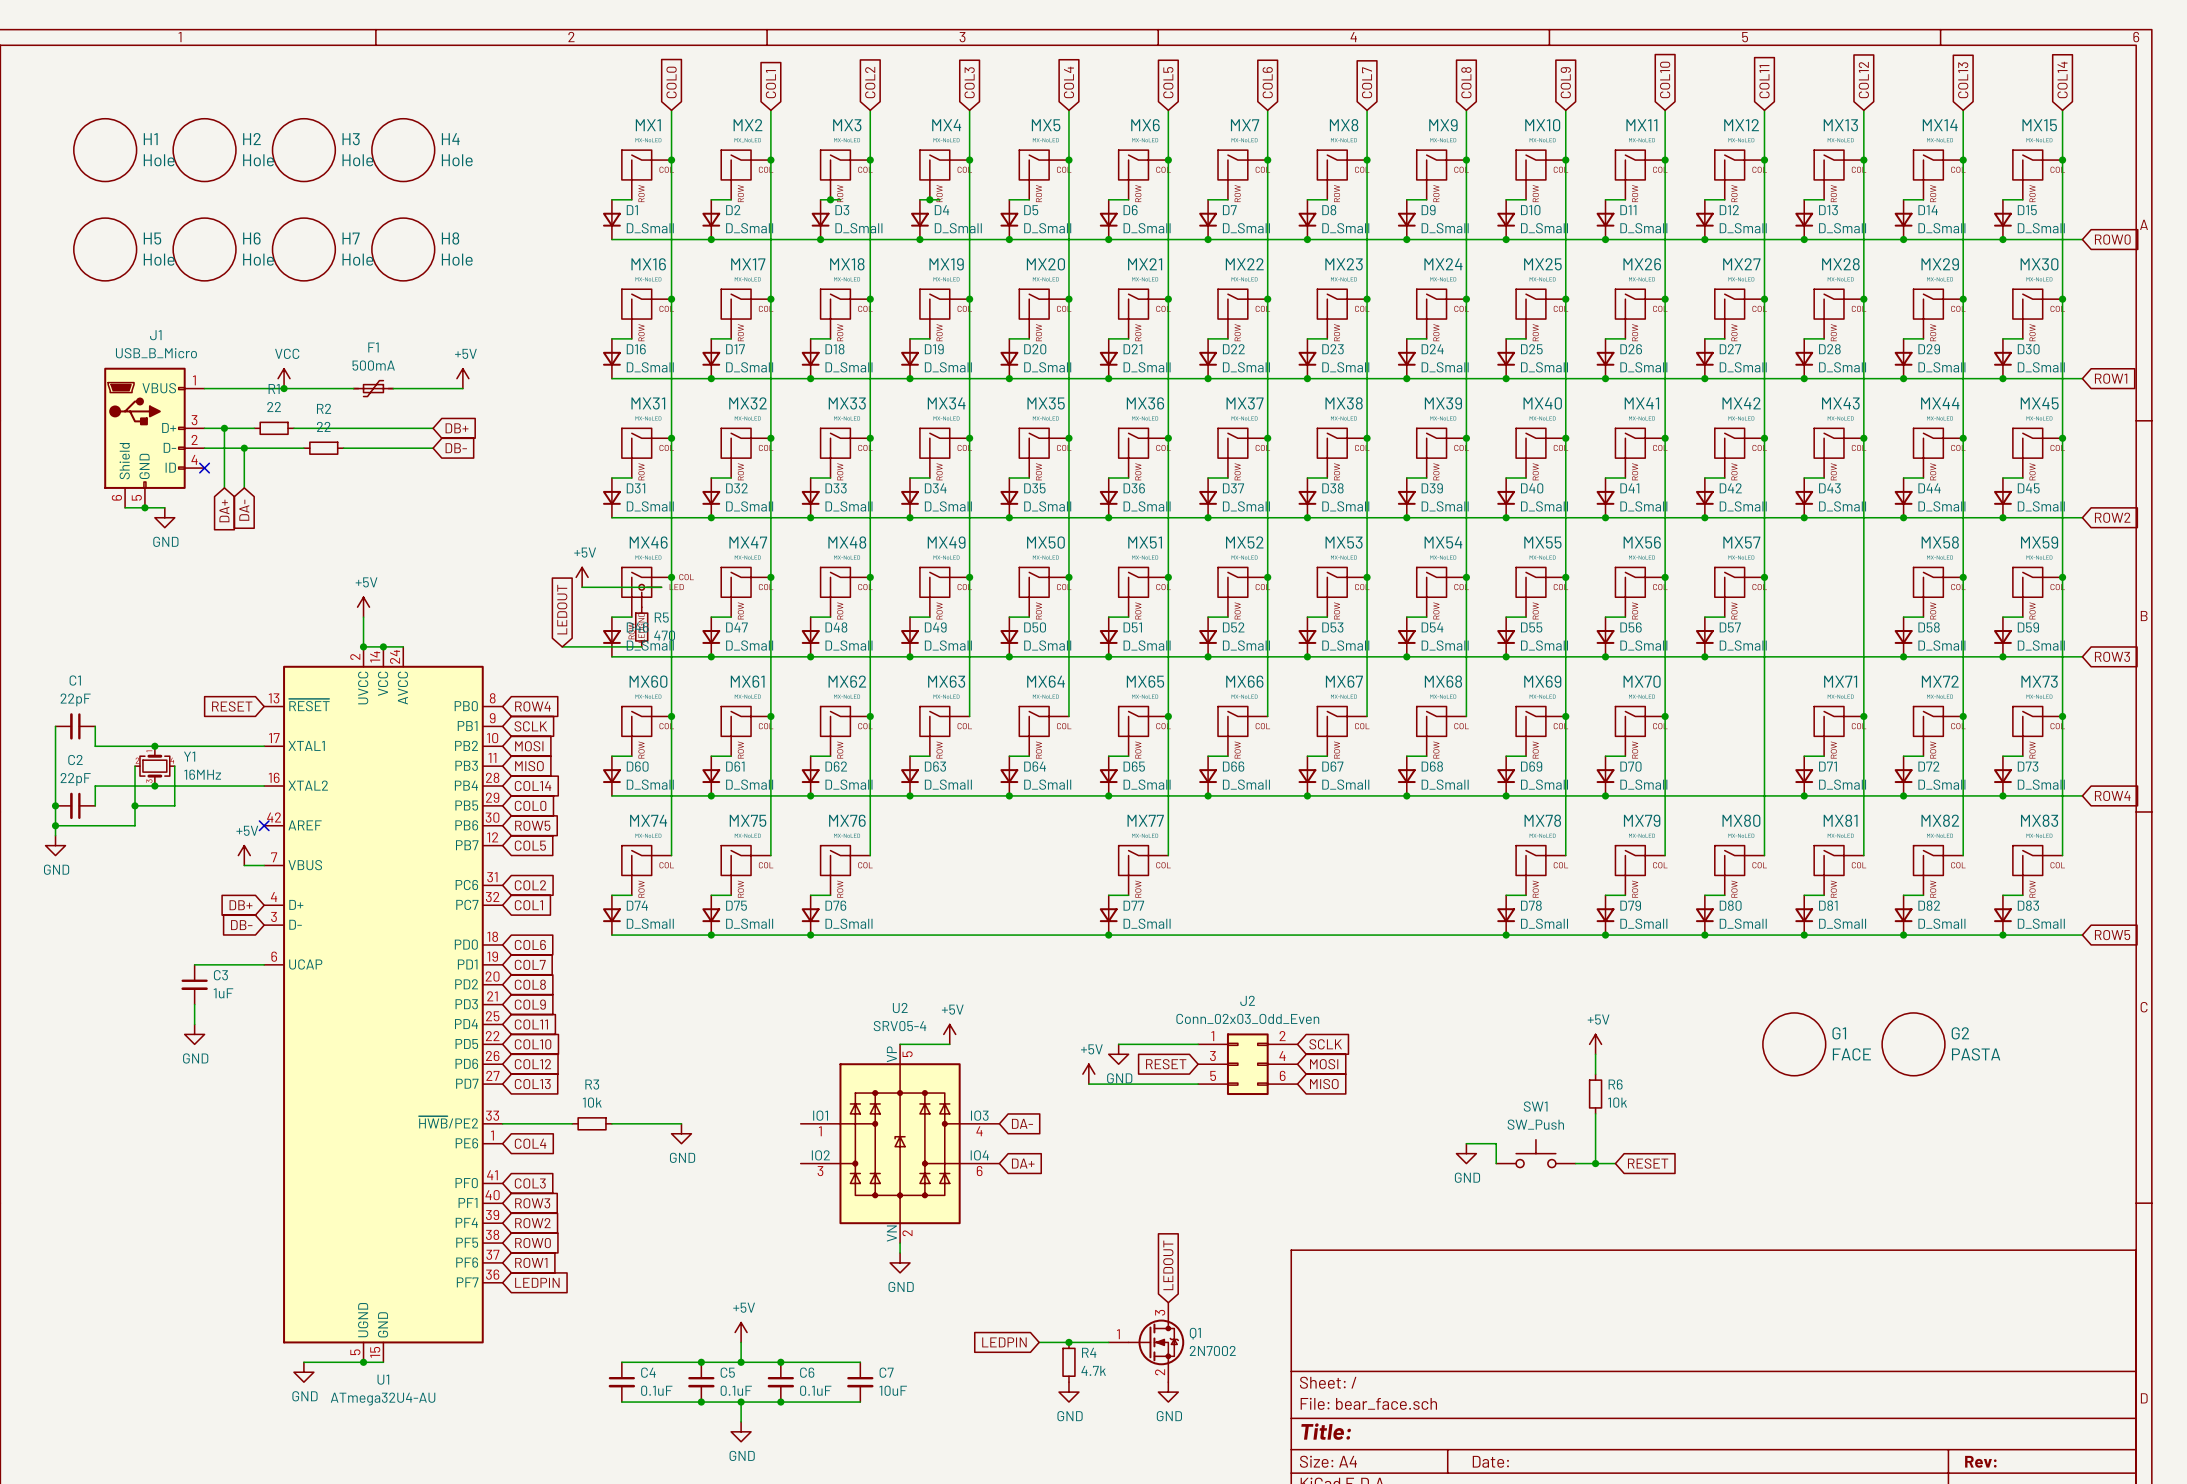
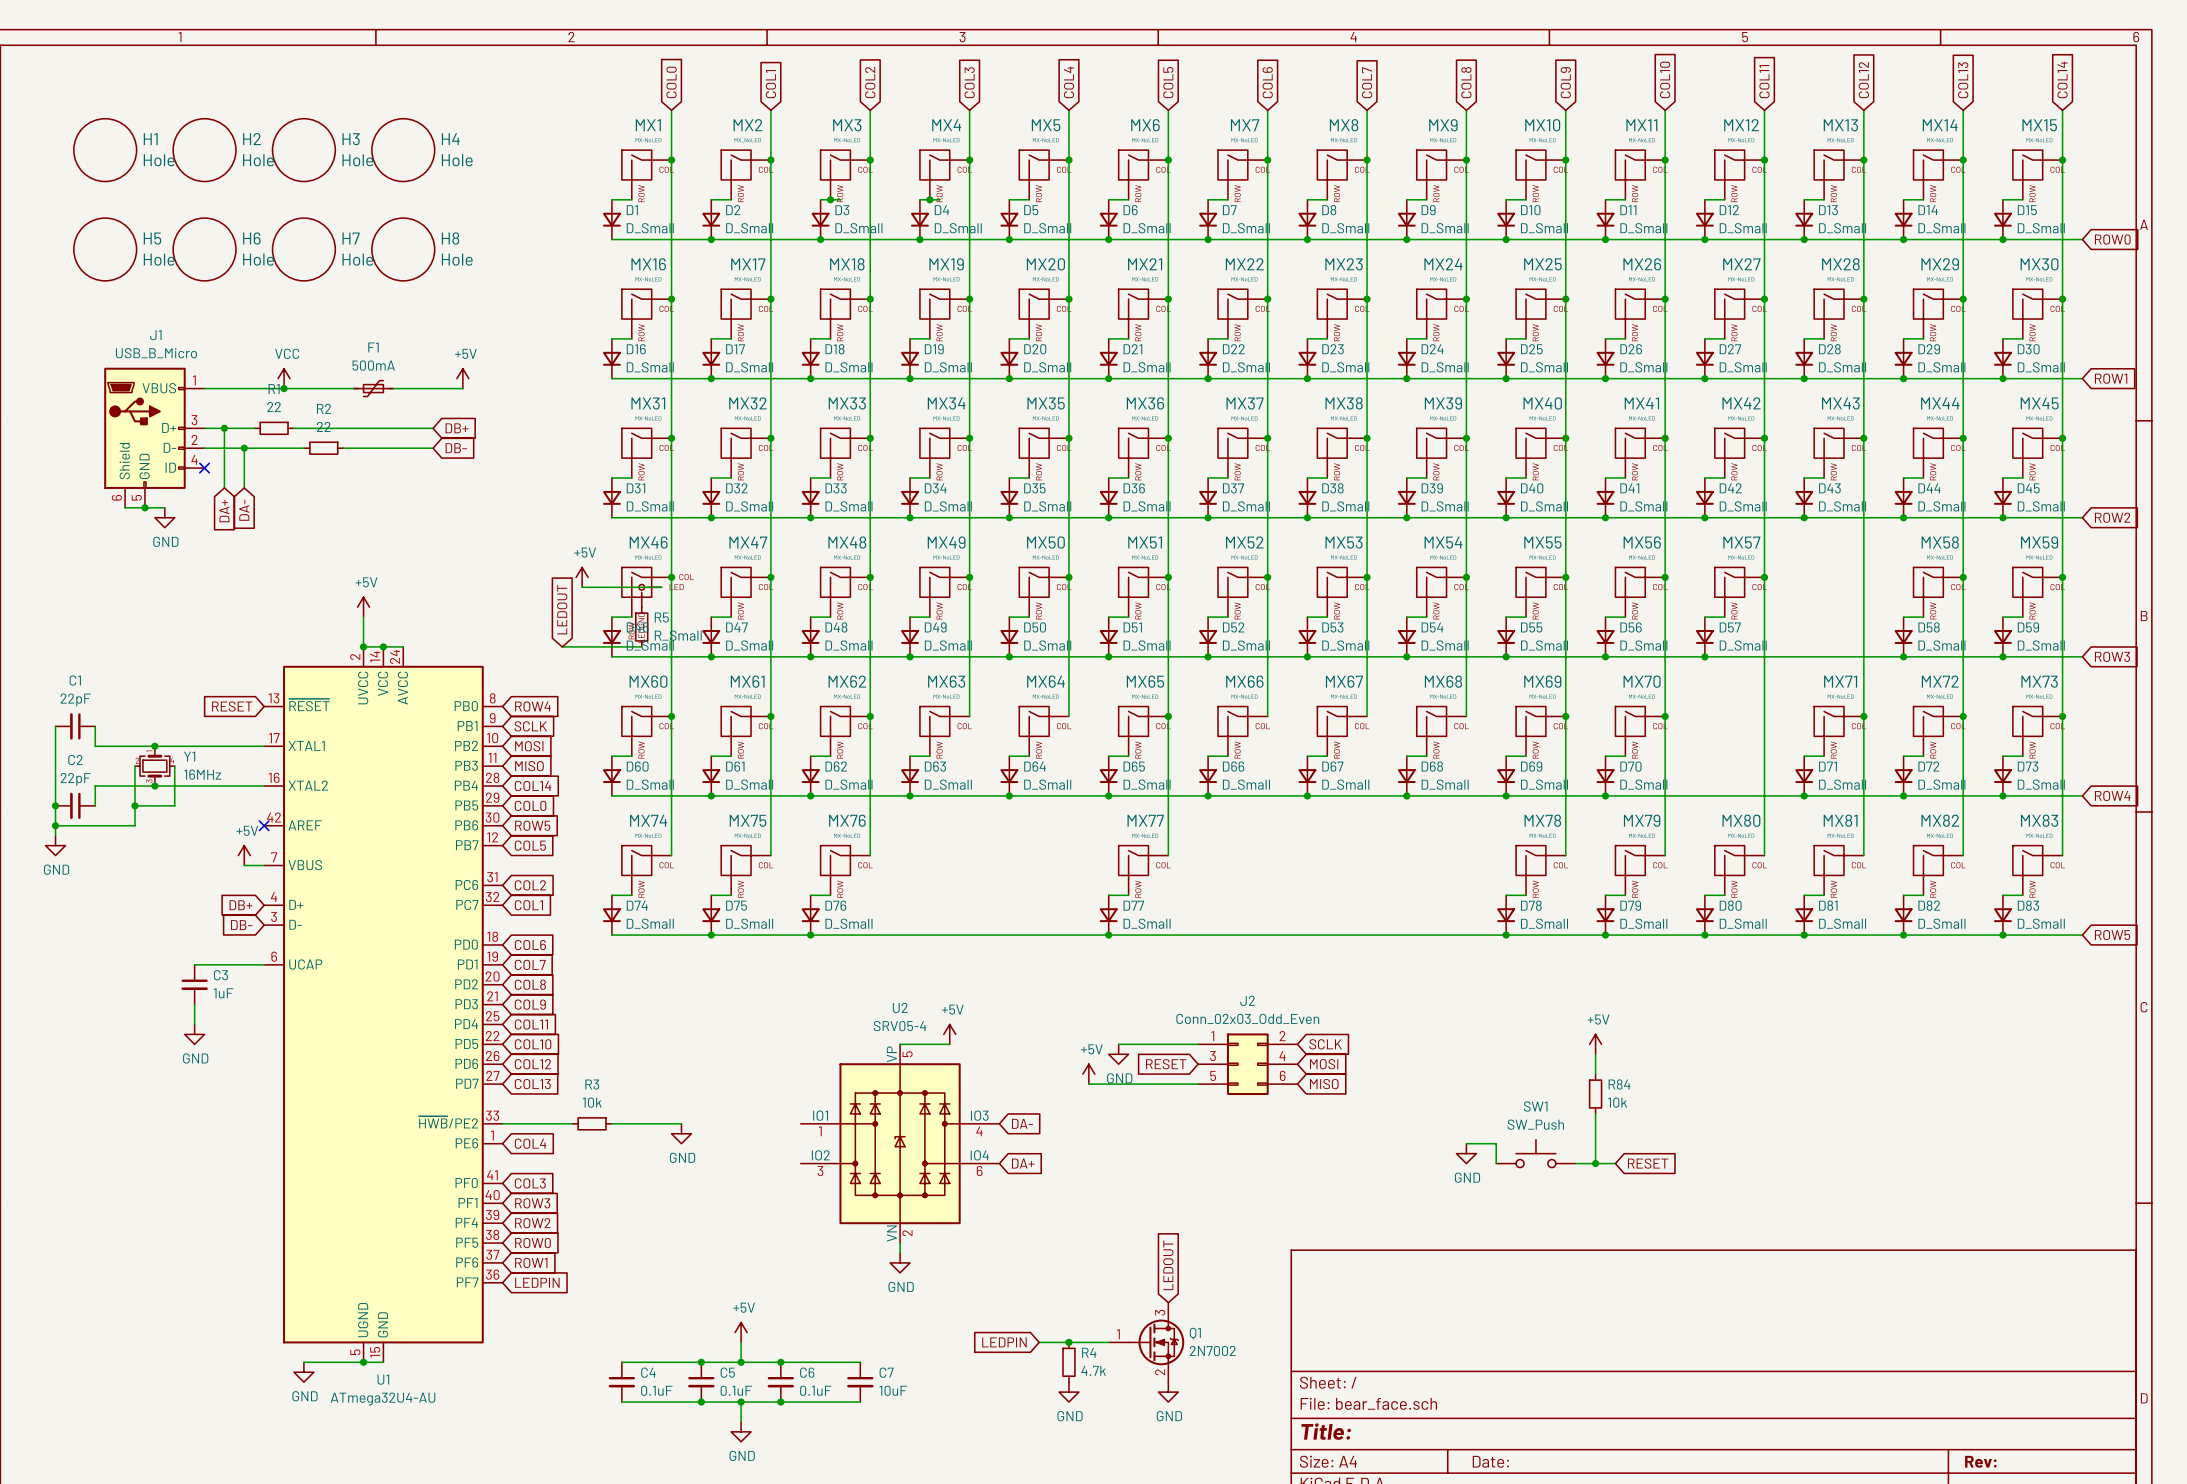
R5 value: 470 (664, 635) -> R_Small (678, 635)
G1: FACE (1794, 1044) -> none
G2: PASTA (1913, 1044) -> none
R6 name: R6 (1615, 1084) -> R84 (1619, 1084)

